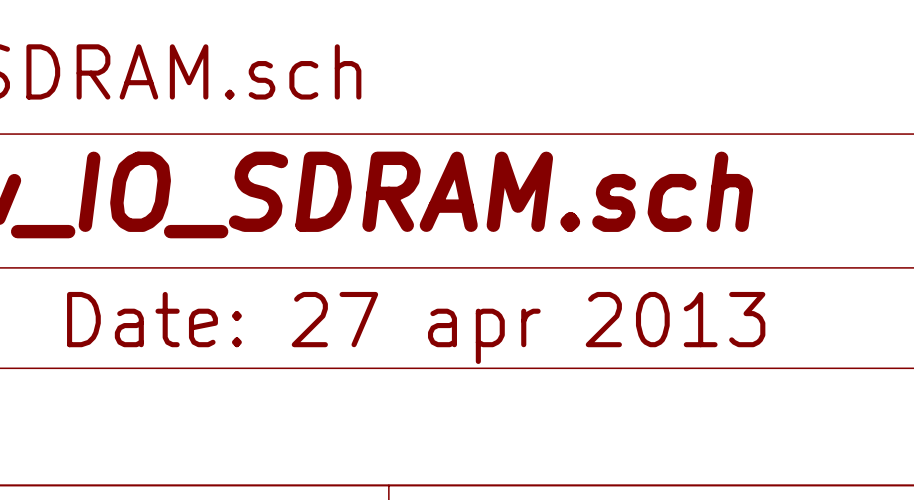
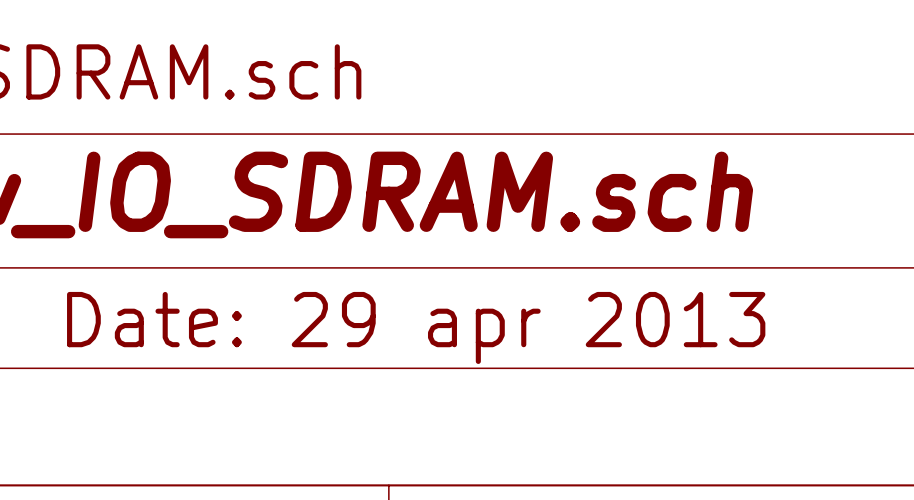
title block: Date: 27 apr 2013 (416, 327) -> Date: 29 apr 2013 (416, 327)

